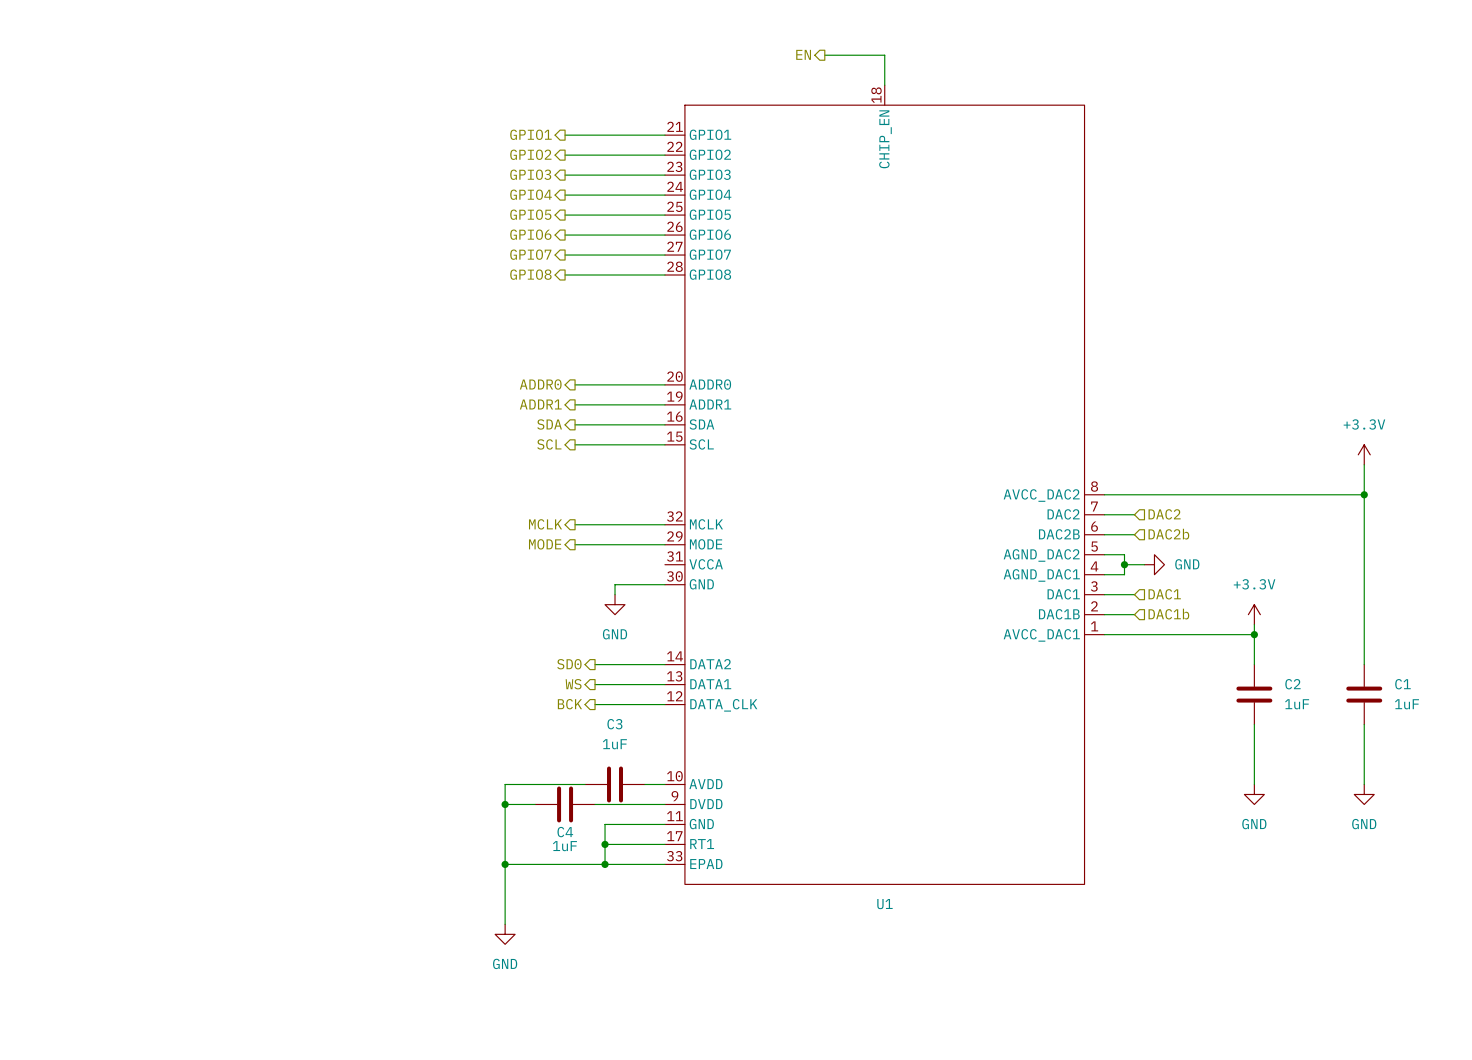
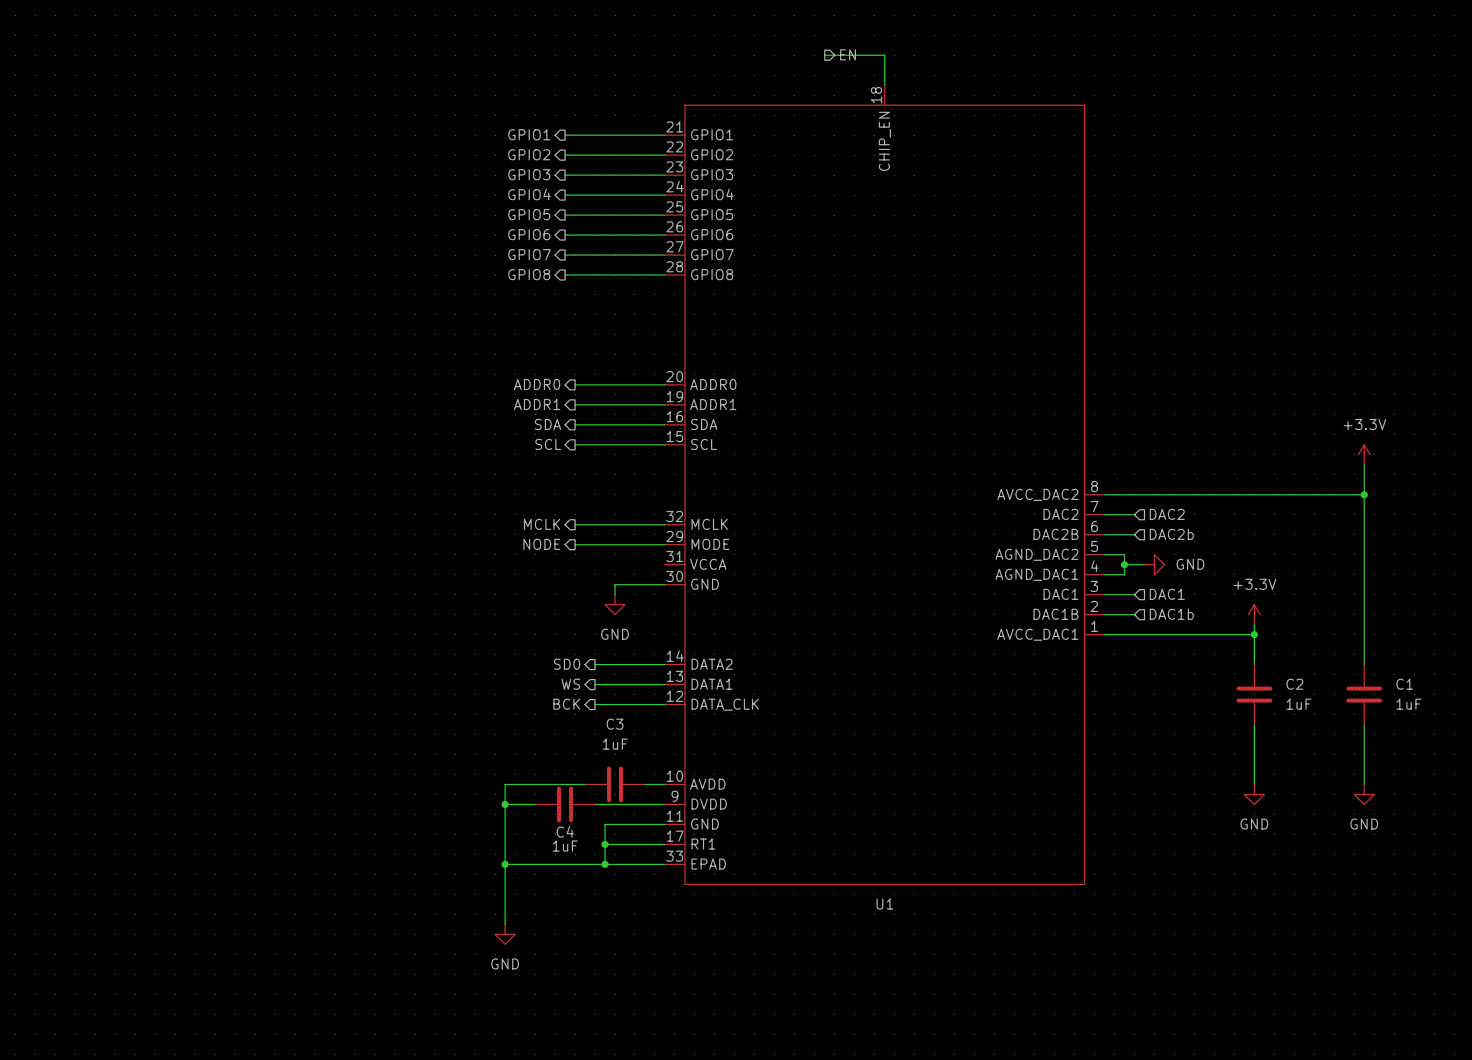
hierarchical label rotation: 0° (803, 54) -> 180° (848, 54)
hierarchical label position: EN (803, 54) -> EN (848, 54)
hierarchical label: MODE (545, 544) -> NODE (541, 544)

